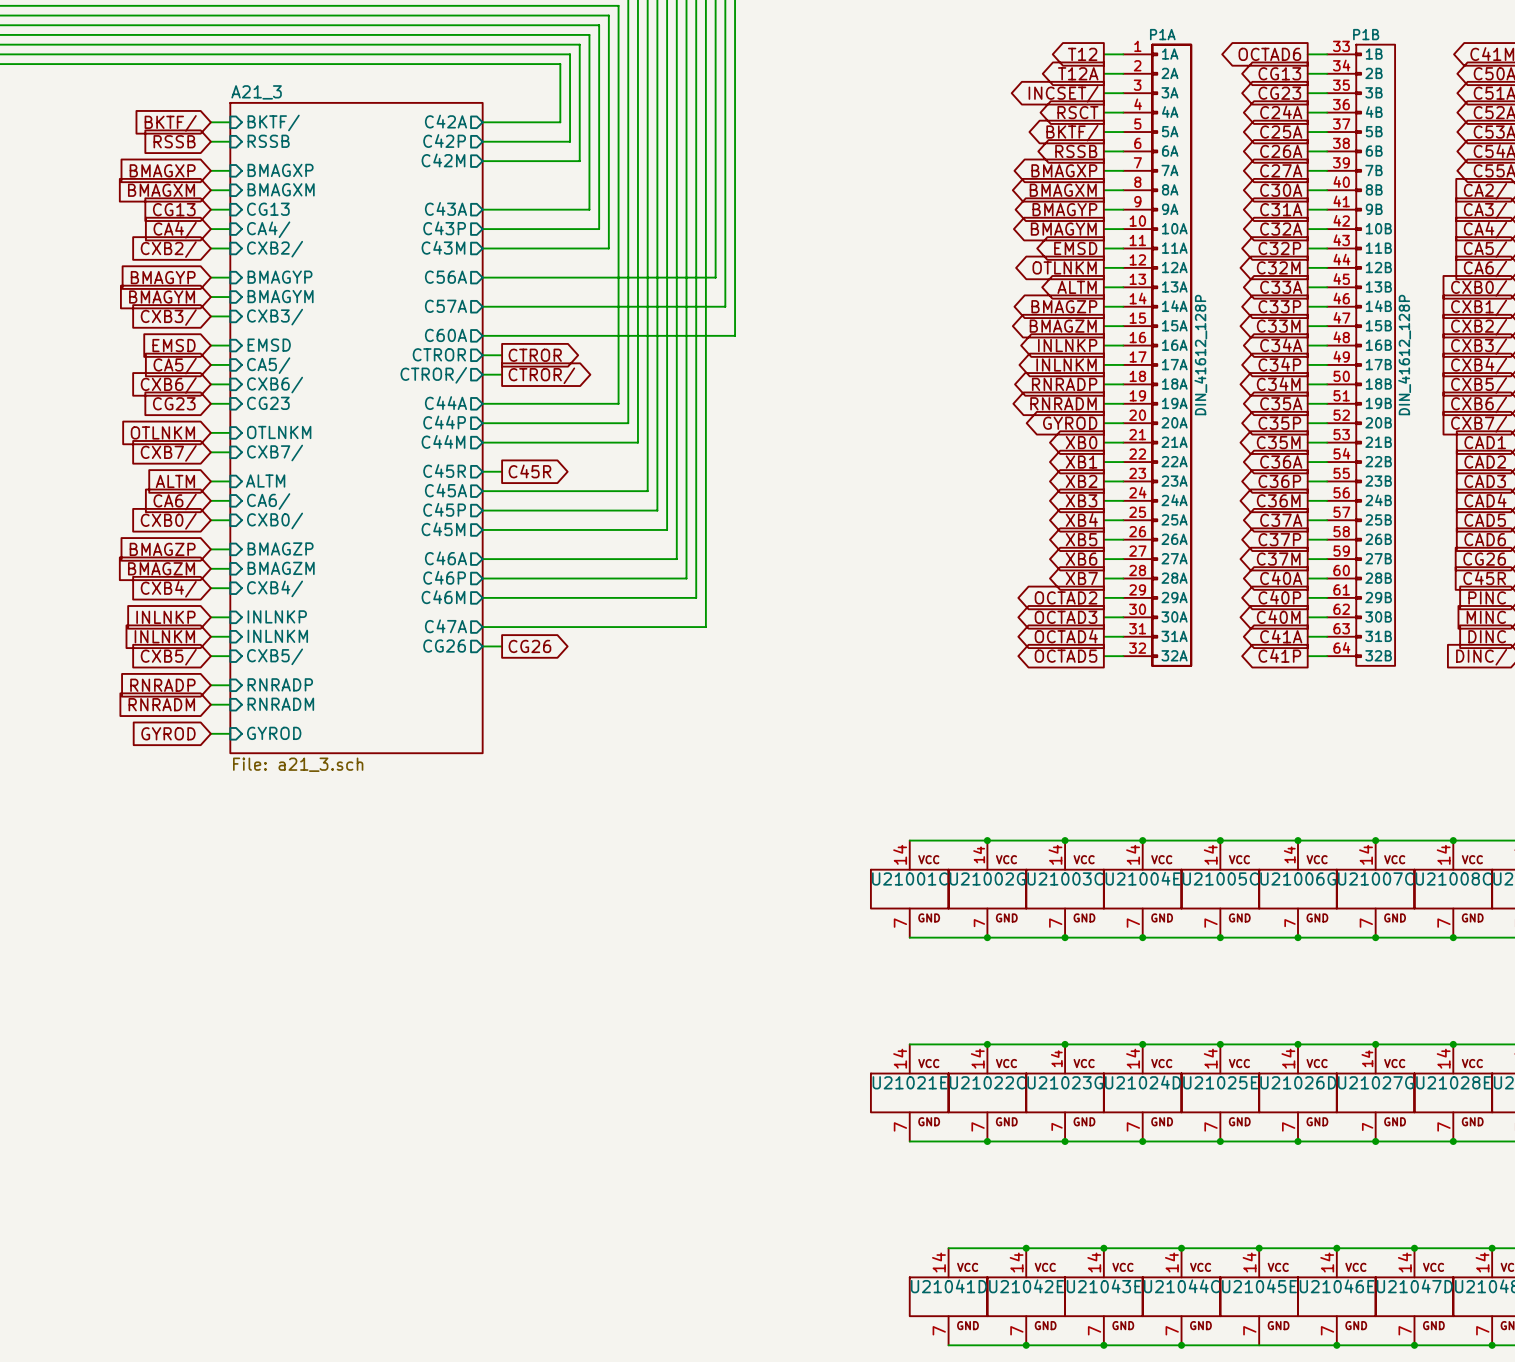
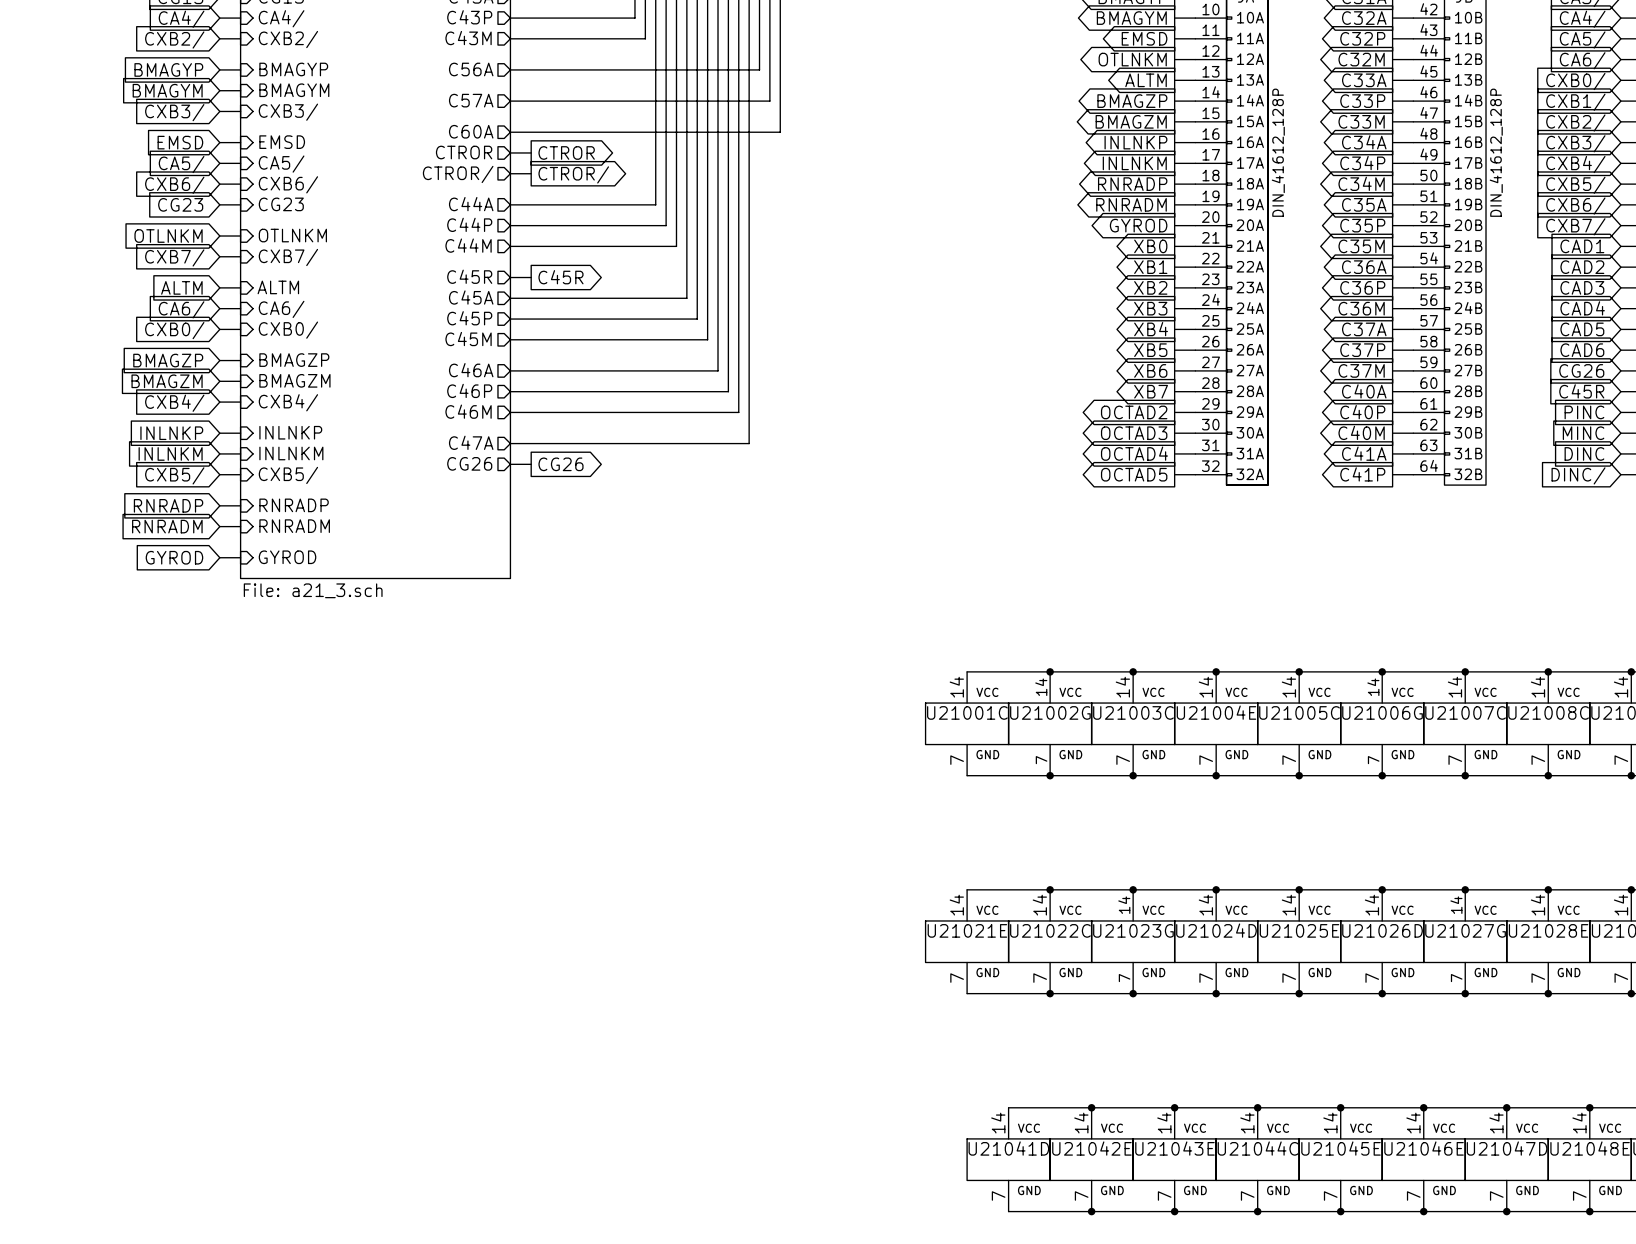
junction: none -> (1340, 1211)

